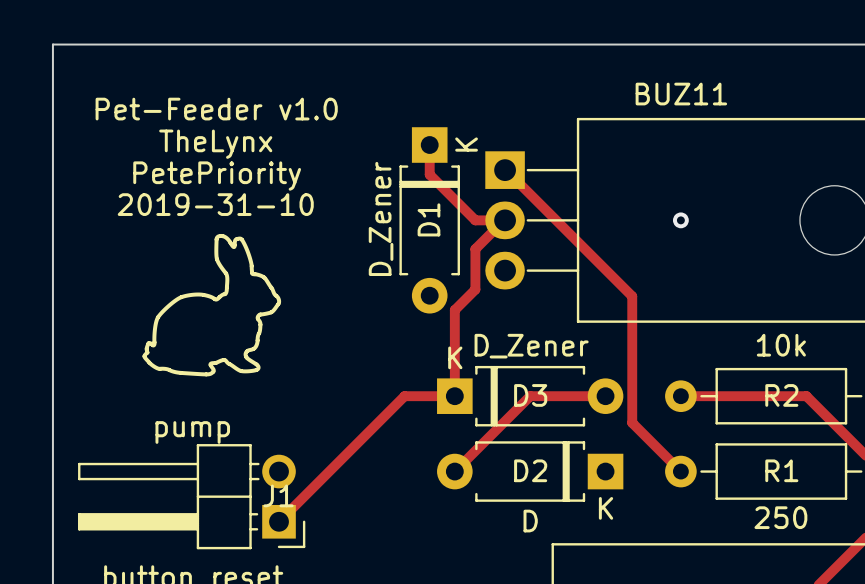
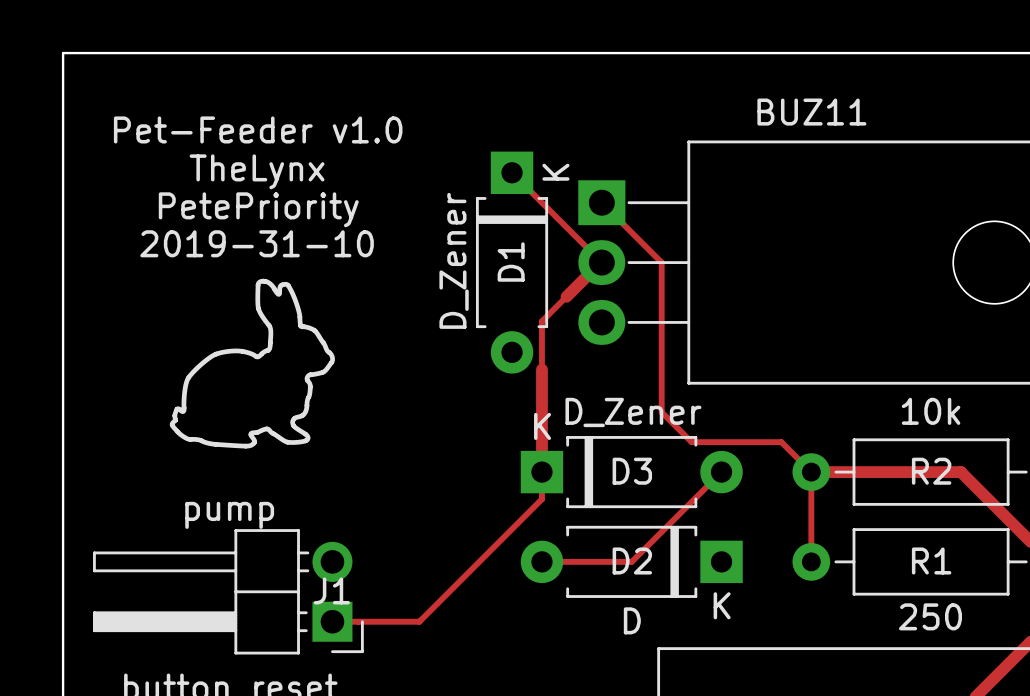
track: (429, 145) (429, 174) (475, 220) (504, 220) -> (512, 172) (600, 262)
track: (506, 170) (632, 296) (632, 422) (680, 471) -> (602, 202) (661, 262) (661, 412) (691, 442) (781, 442) (811, 472) (811, 561)
via: (680, 220) -> none
track: (475, 249) (475, 289) (454, 310) -> (566, 296) (541, 321) (541, 369)
track: (454, 396) (404, 396) (279, 521) -> (541, 472) (541, 499) (419, 621) (332, 621)
track: (605, 396) (530, 396) (454, 471) -> (721, 472) (631, 561) (541, 561)

